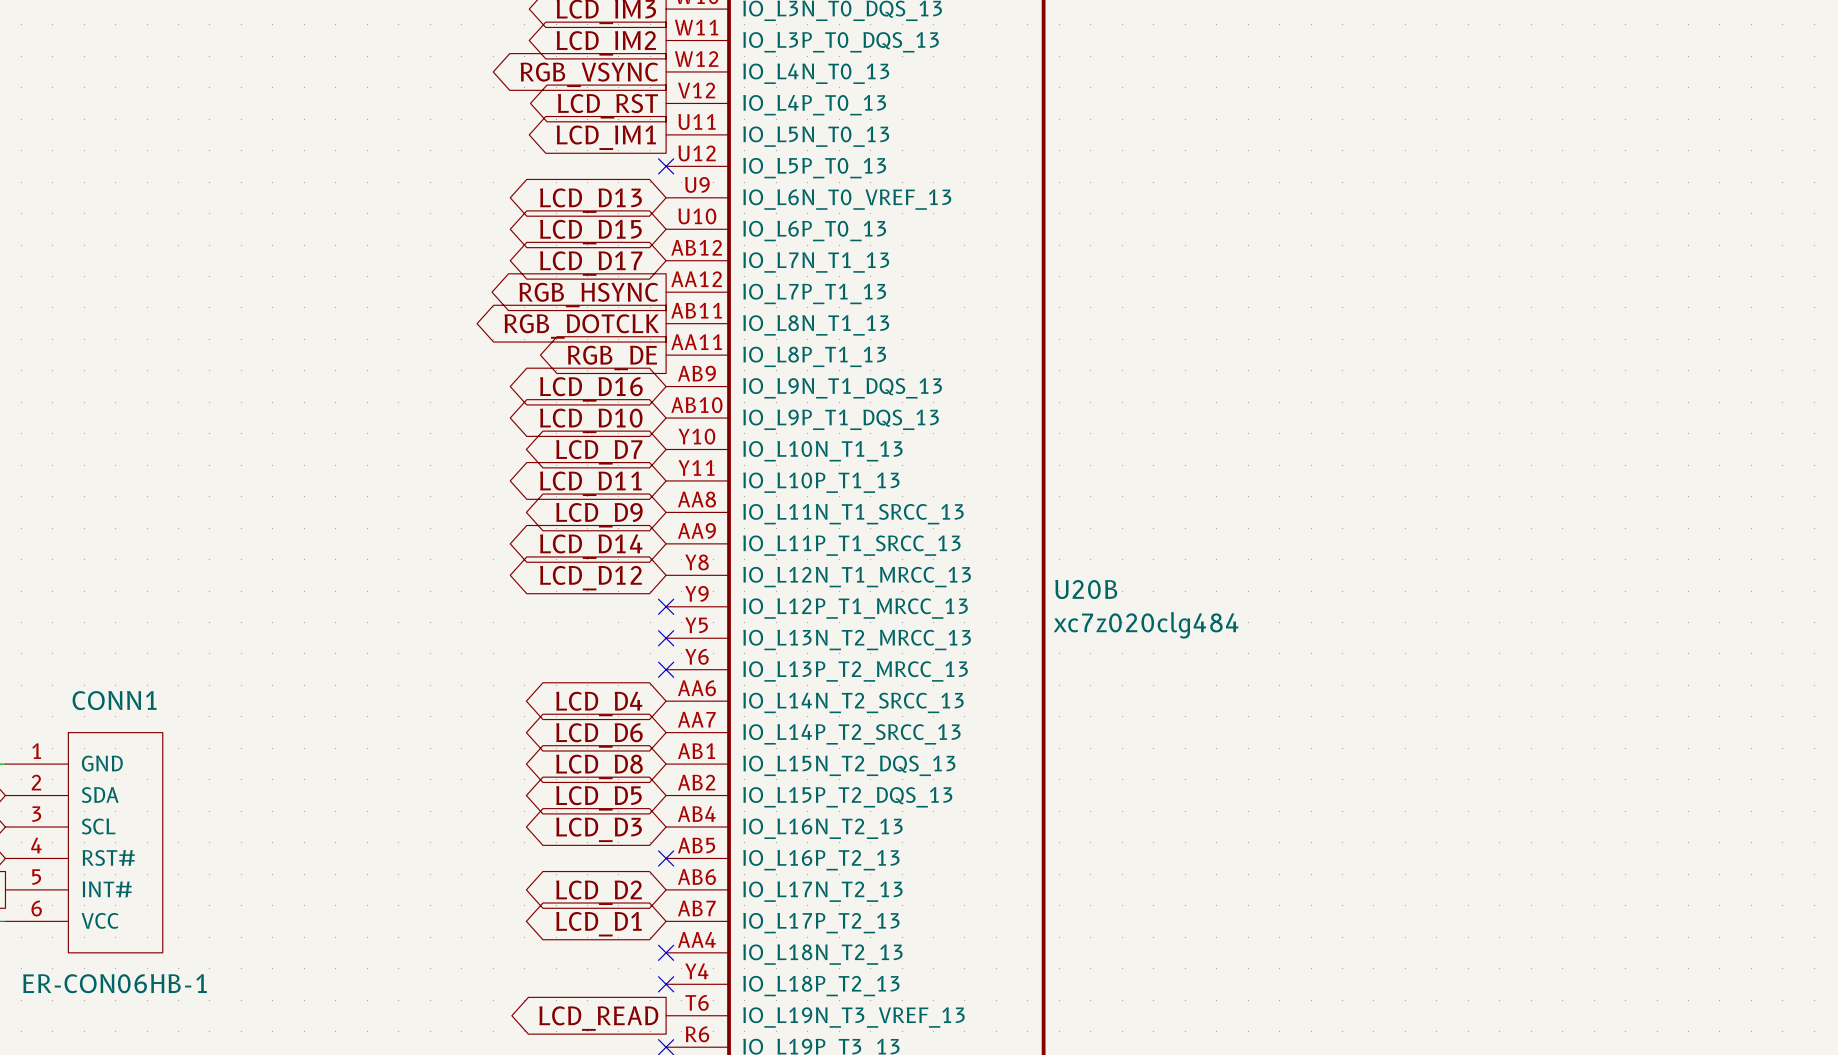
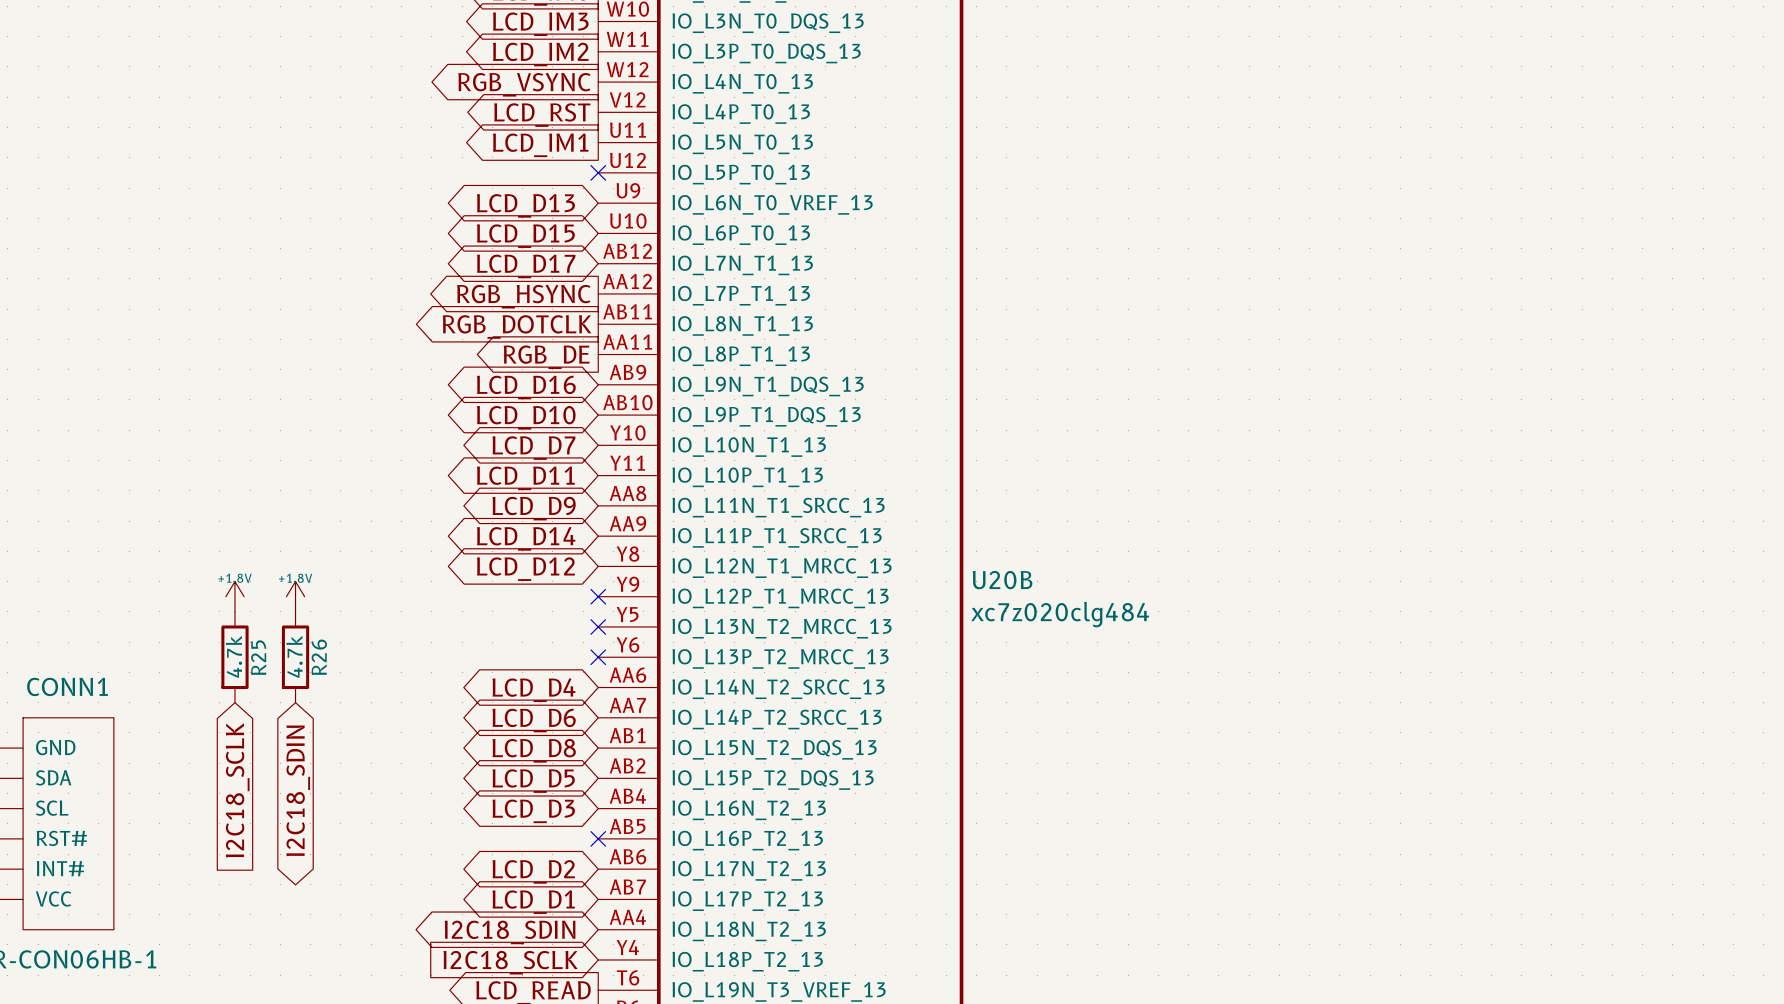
power symbol: none -> +1.8V (234, 596)
power symbol: none -> +1.8V (295, 596)
R25: none -> 4.7k (234, 657)
R26: none -> 4.7k (295, 657)
global label: none -> I2C18_SCLK (237, 790)
global label: none -> I2C18_SDIN (298, 790)
no-connect mark: (666, 952) -> none
global label: none -> I2C18_SDIN (510, 932)
no-connect mark: (666, 984) -> none
global label: none -> I2C18_SCLK (510, 962)

